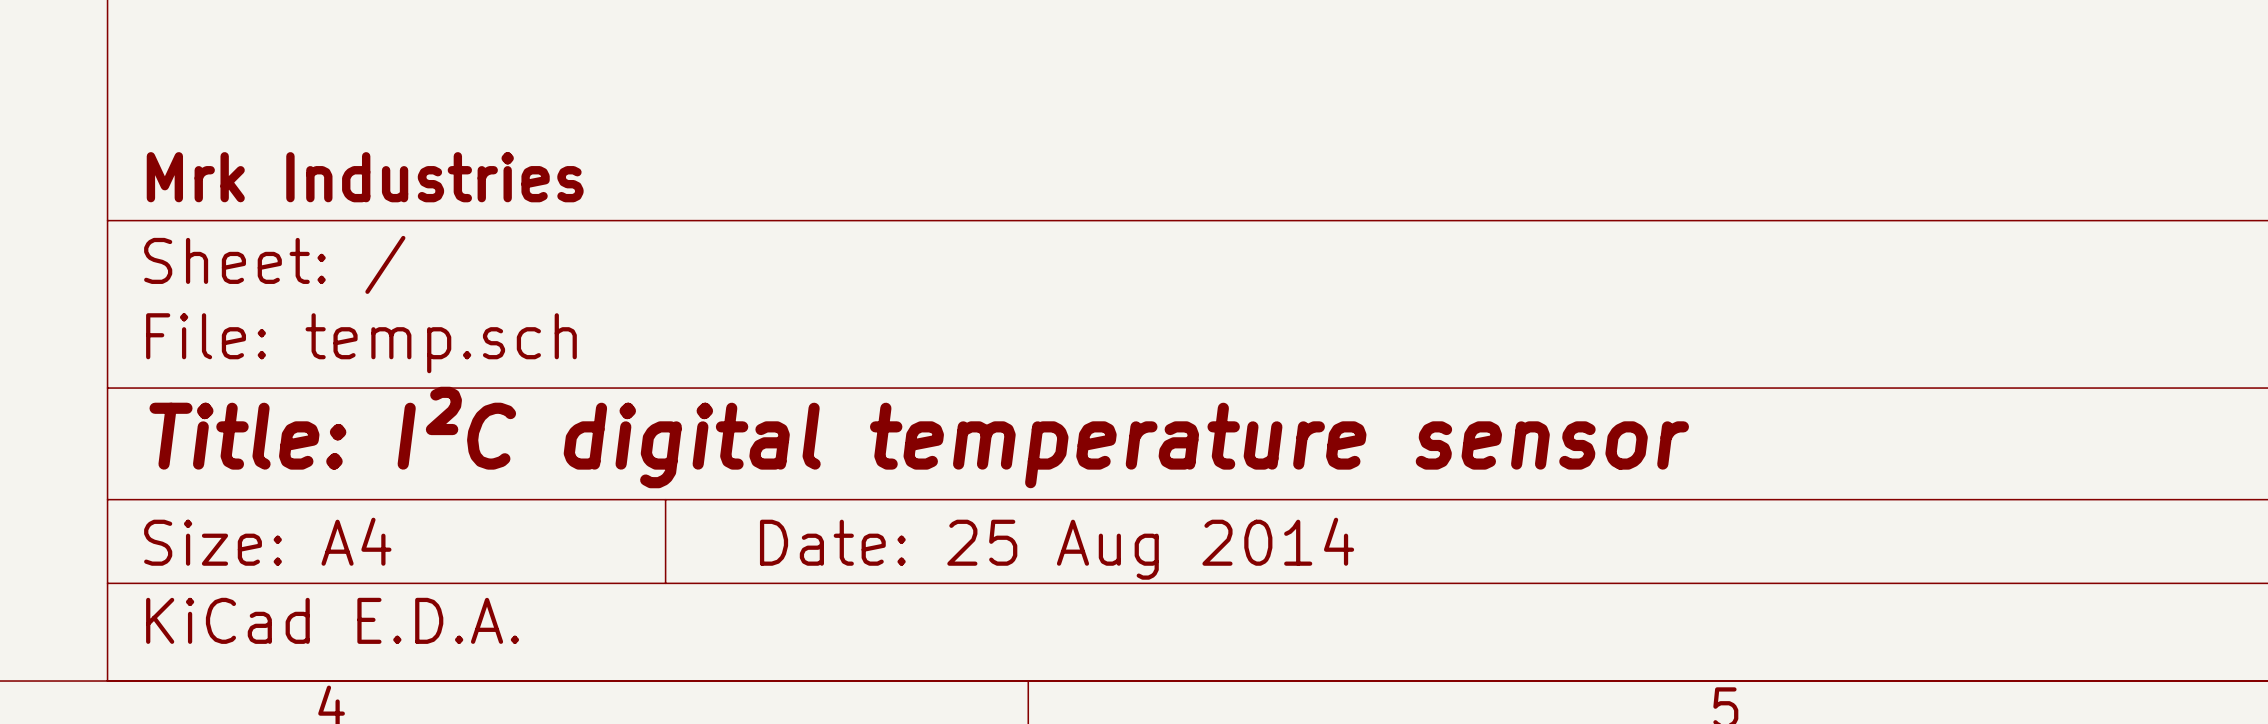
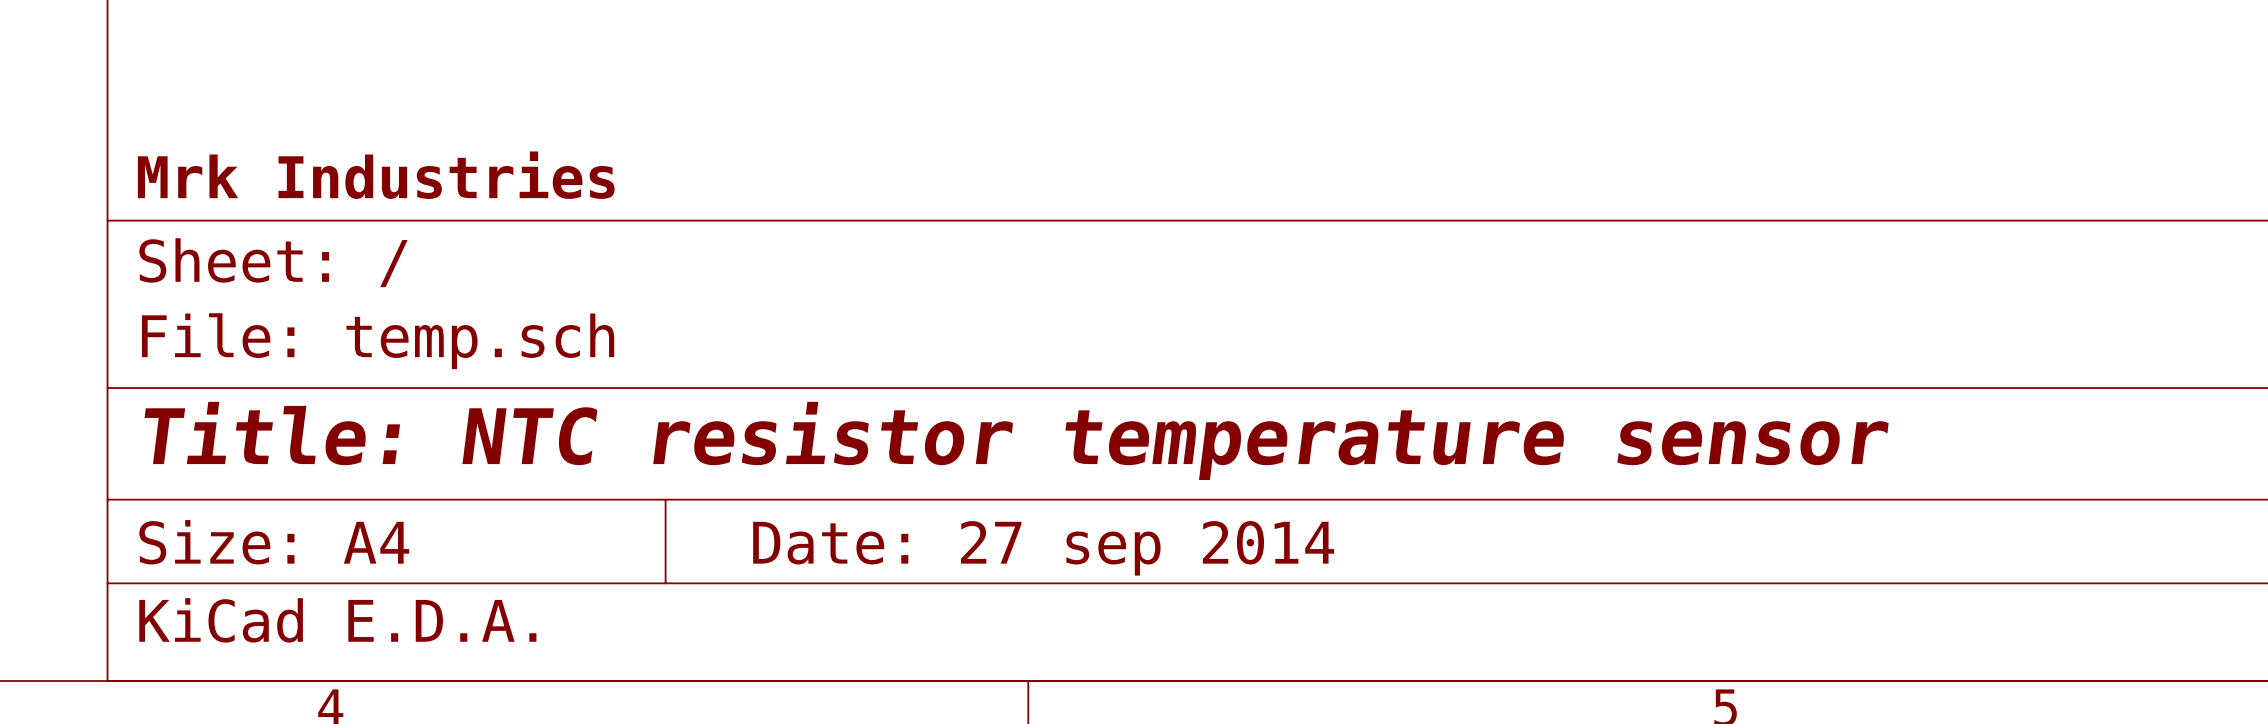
title block: Title: I²C digital temperature sensor (919, 437) -> Title: NTC resistor temperature sensor (1016, 440)
title block: Date: 25 Aug 2014 (1057, 548) -> Date: 27 sep 2014 (1043, 548)

